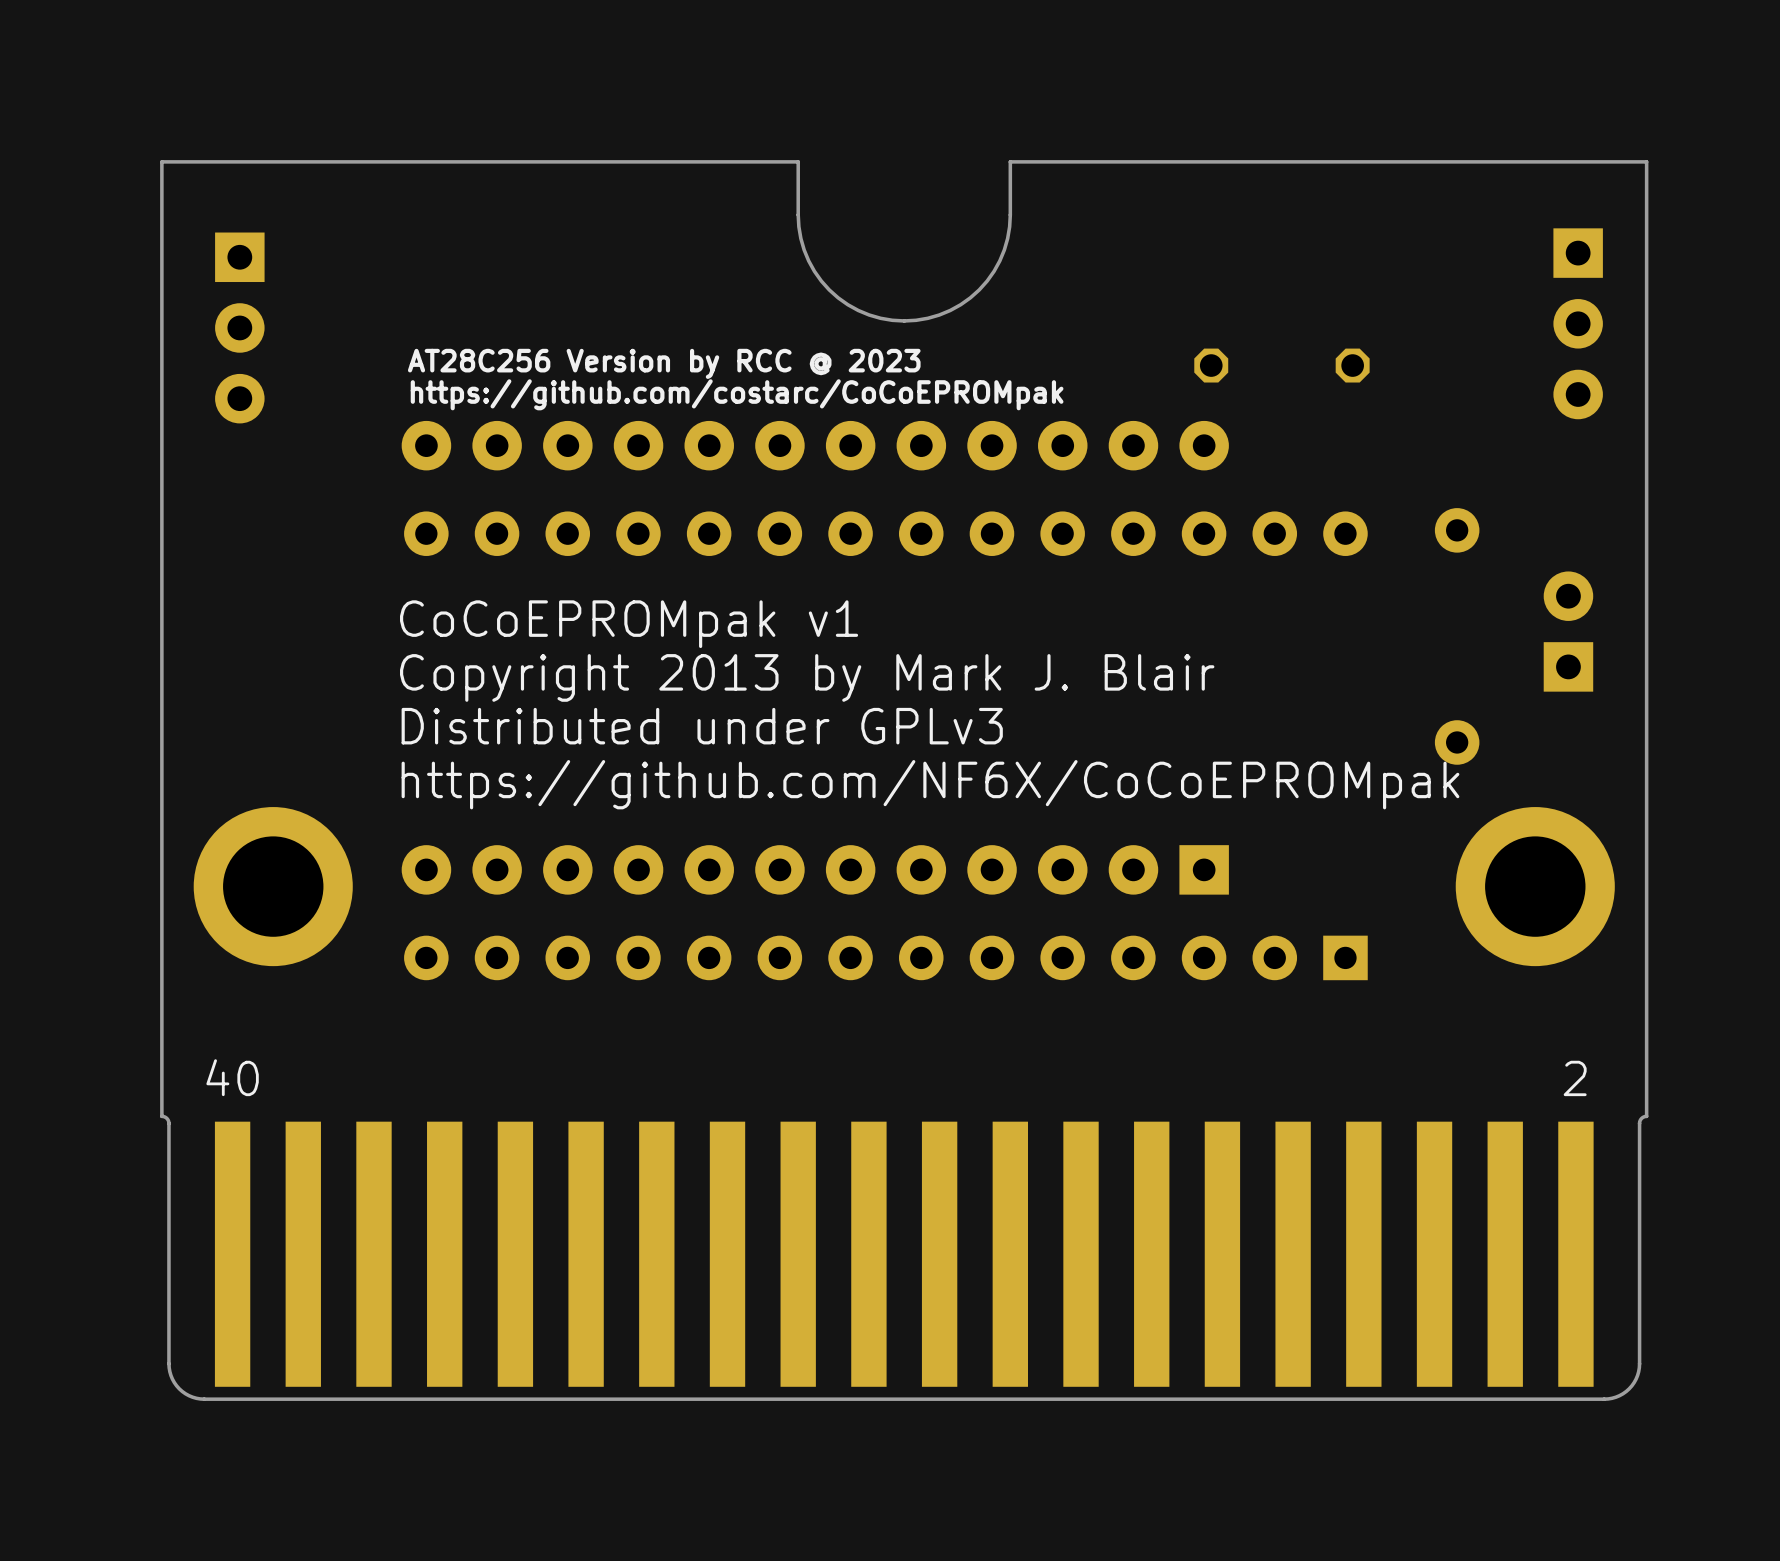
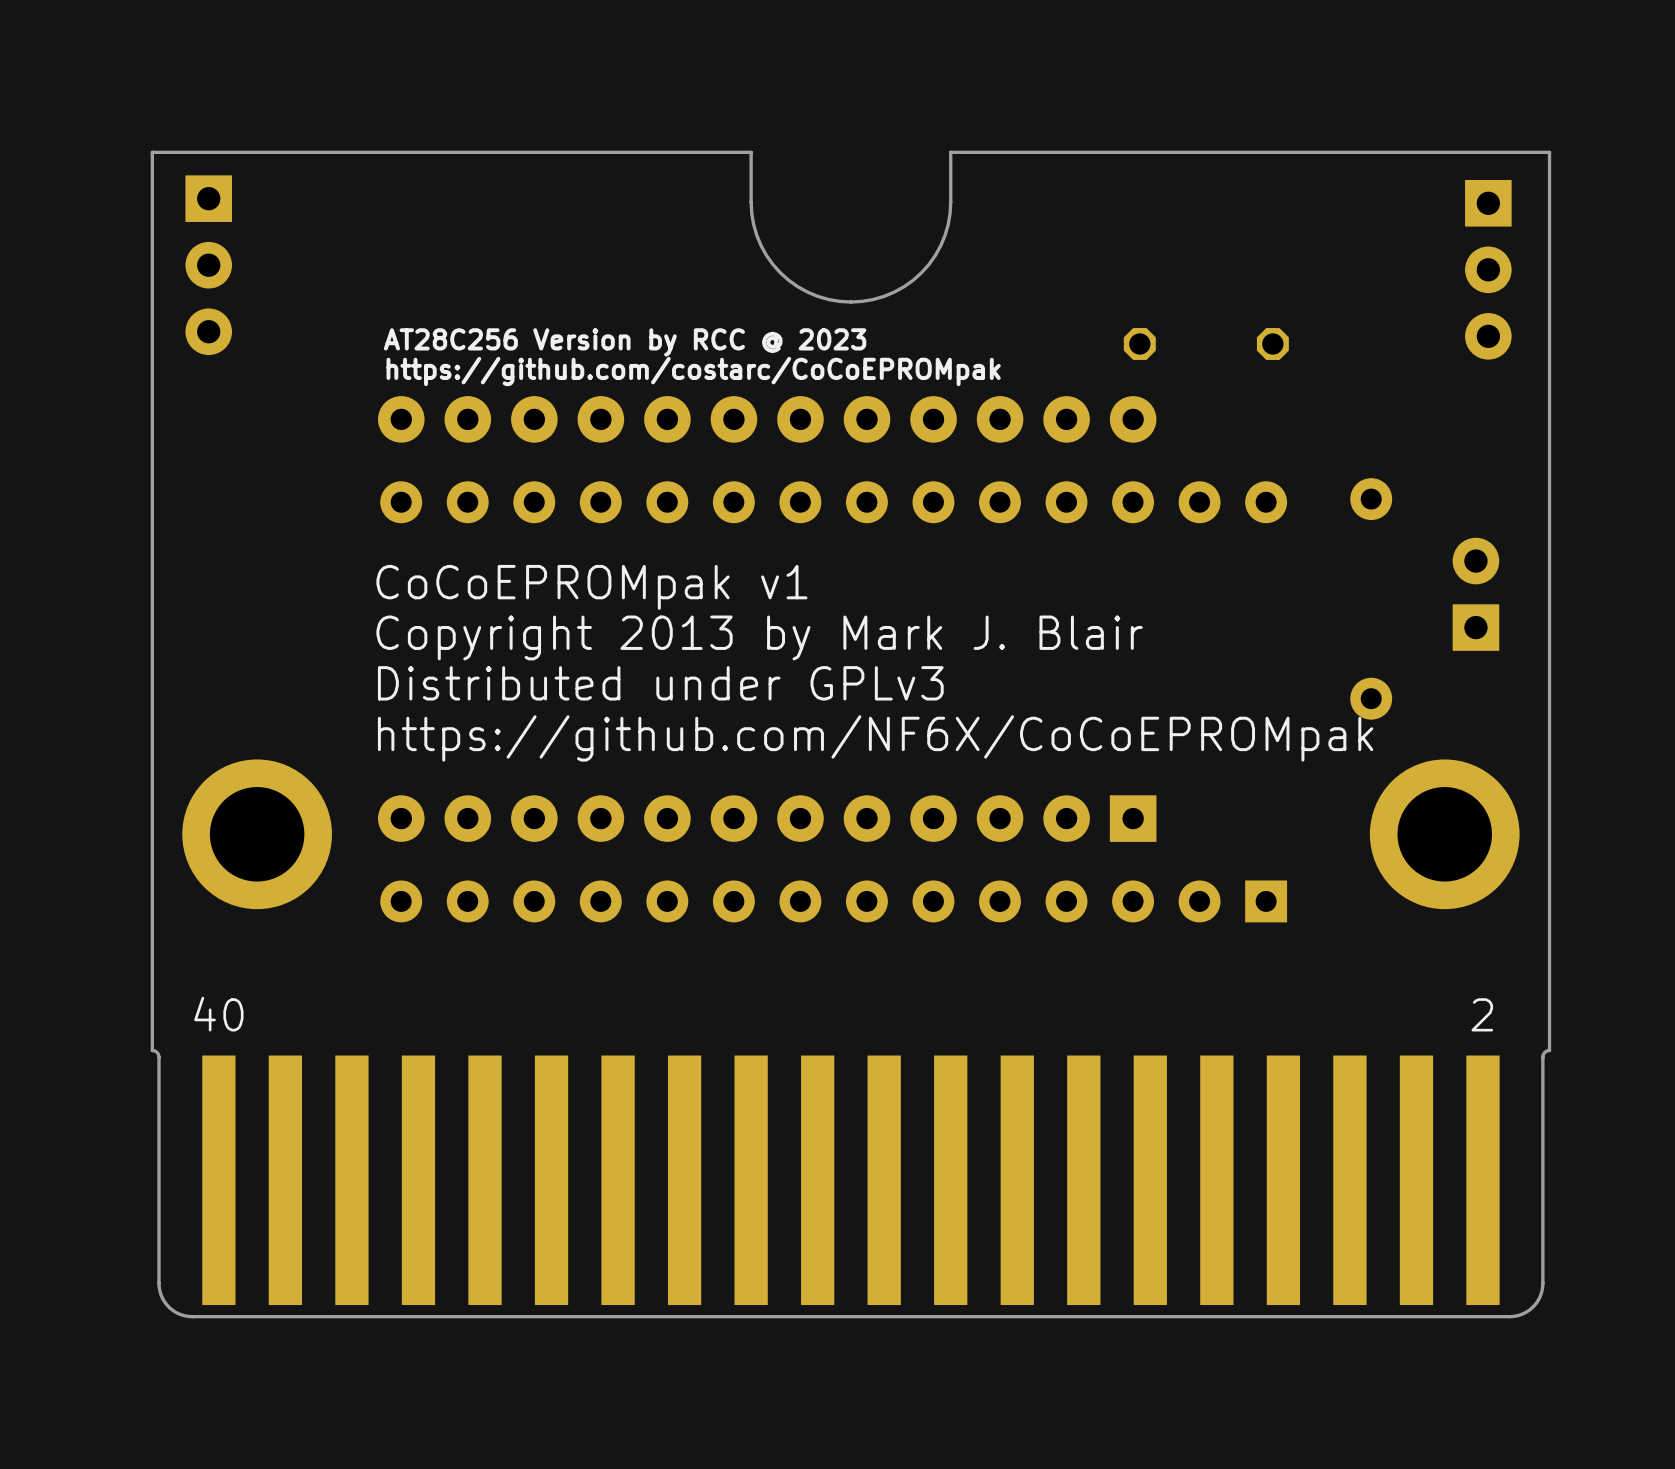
part position: (1578, 323) -> (1488, 269)
part position: (239, 327) -> (208, 265)

